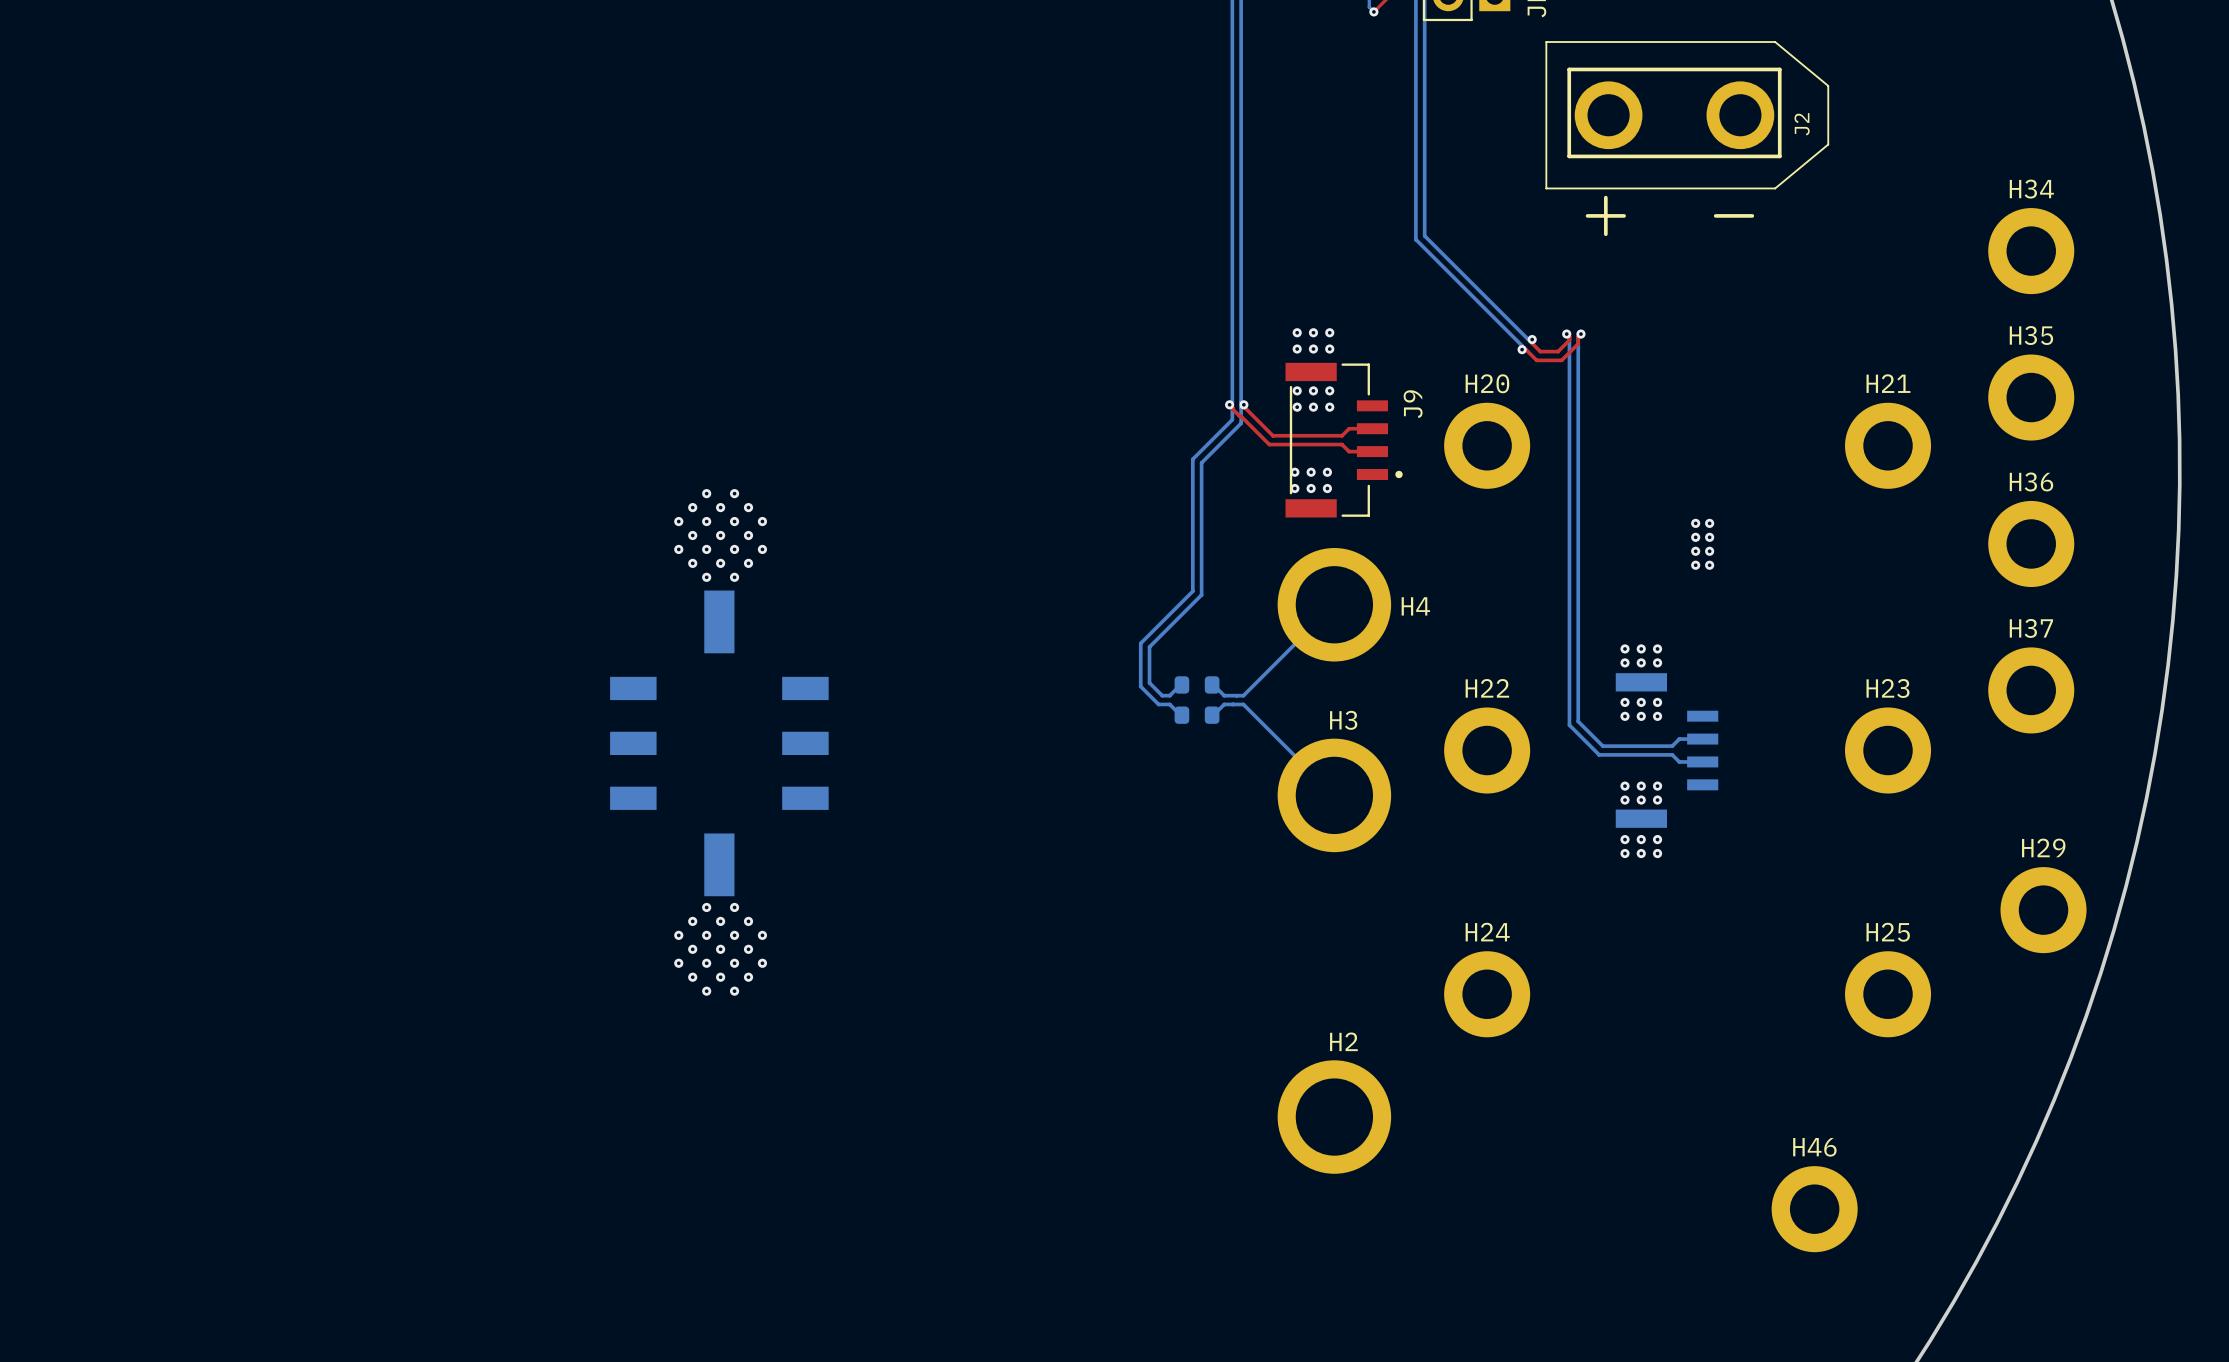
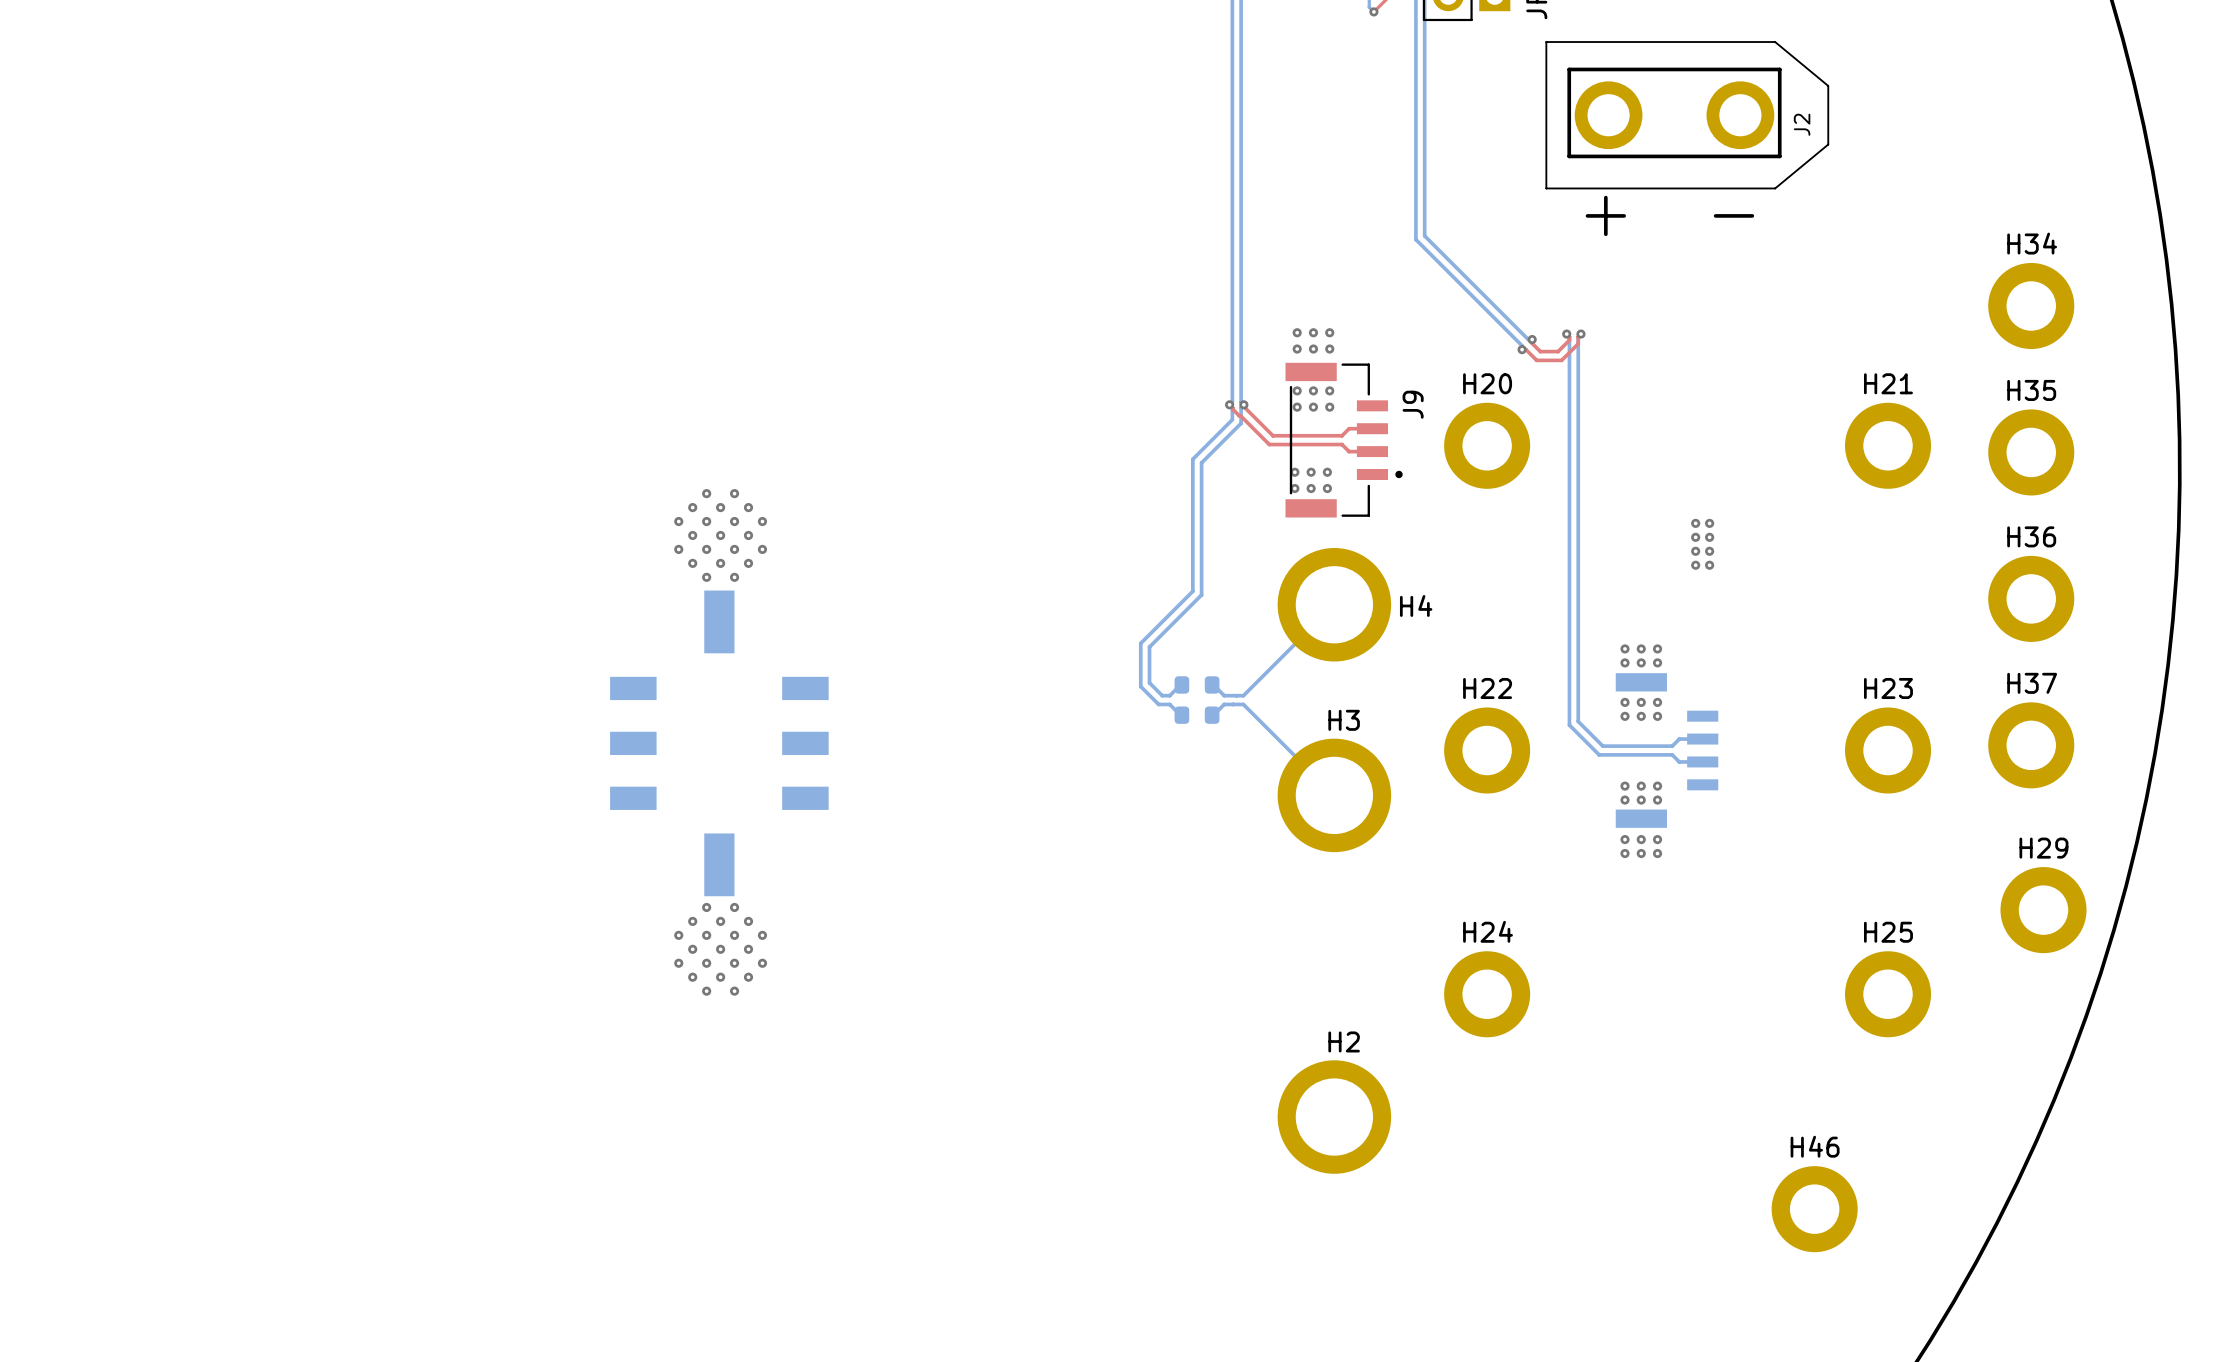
H34 position: (2031, 251) -> (2031, 306)
H35 position: (2031, 397) -> (2031, 452)
H36 position: (2031, 543) -> (2031, 598)
H37 position: (2031, 690) -> (2031, 745)

